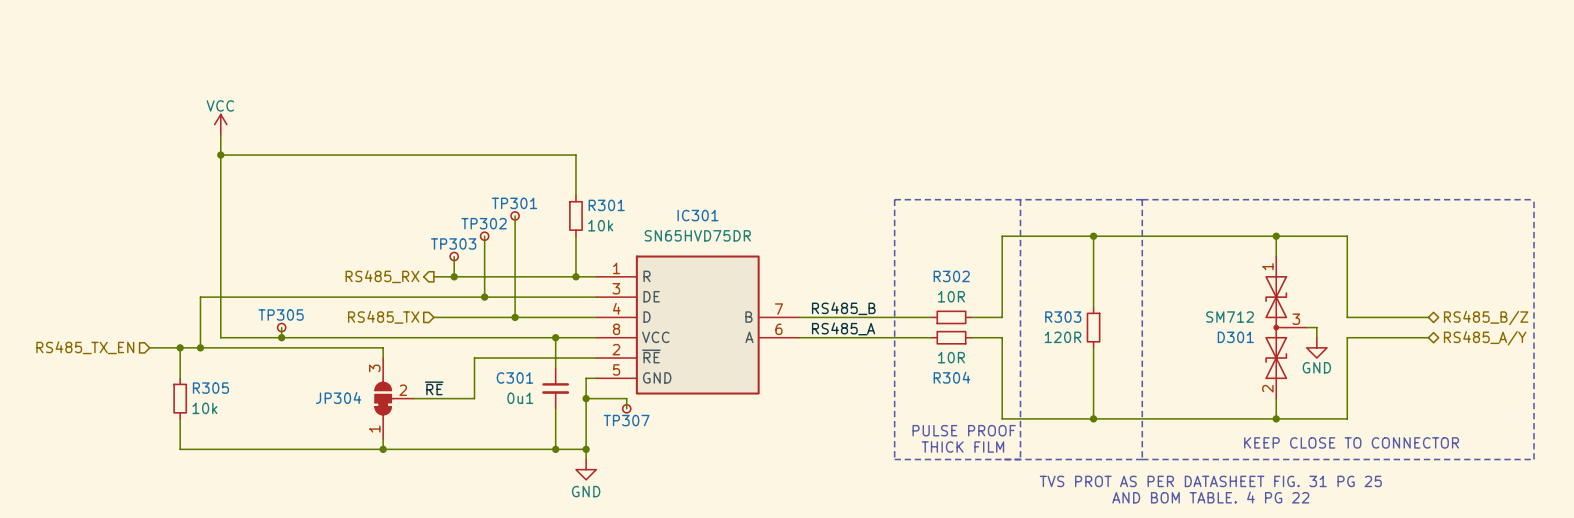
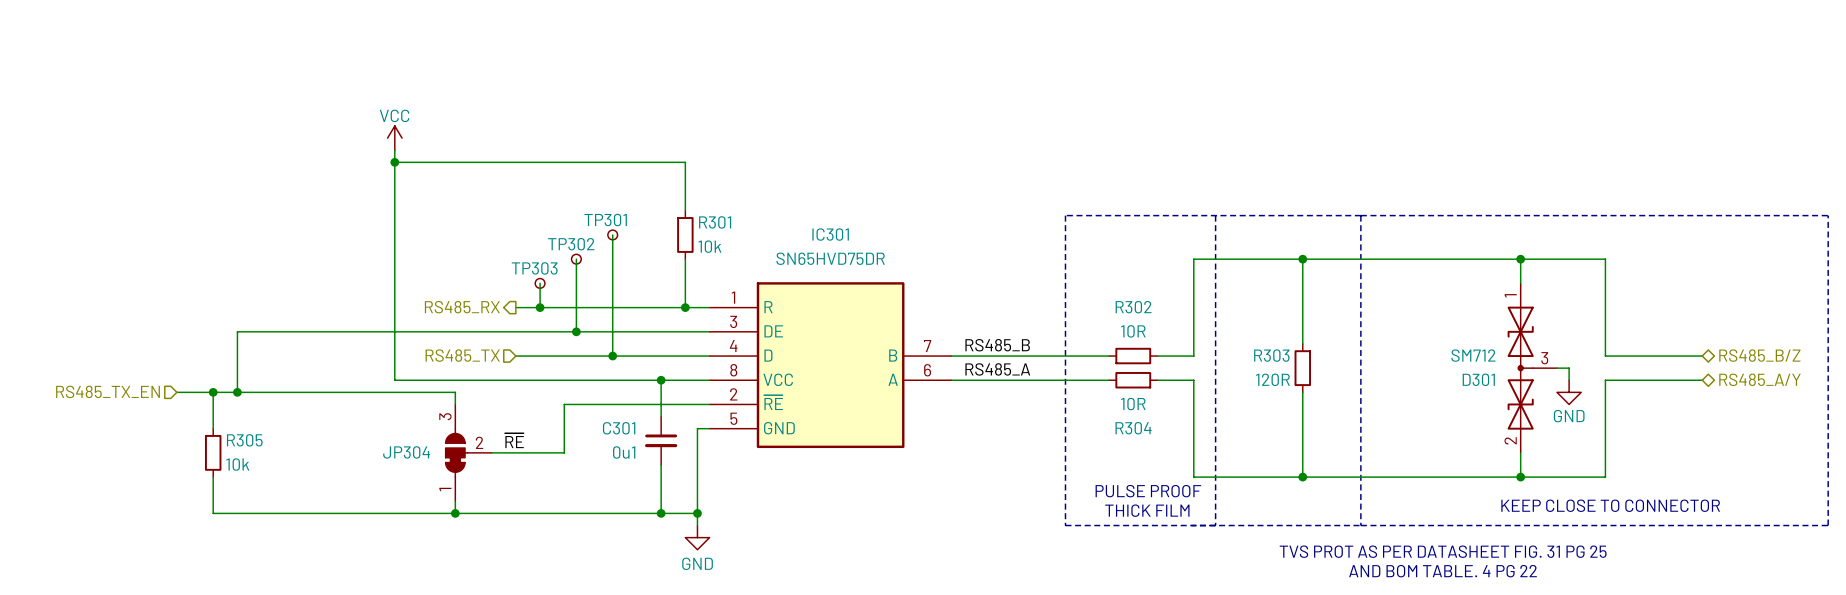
power symbol position: VCC (220, 124) -> VCC (394, 138)
wire: (220, 134) (220, 337) (332, 337) -> (394, 150) (394, 380)
wire: (220, 155) (332, 155) -> none
junction: (220, 155) -> none
junction: none -> (394, 162)
wire: (281, 327) (281, 337) -> none
TP305: (281, 327) -> none
junction: (281, 337) -> none
wire: (586, 398) (626, 398) (626, 408) -> none
junction: (586, 398) -> none
TP307: (626, 408) -> none

